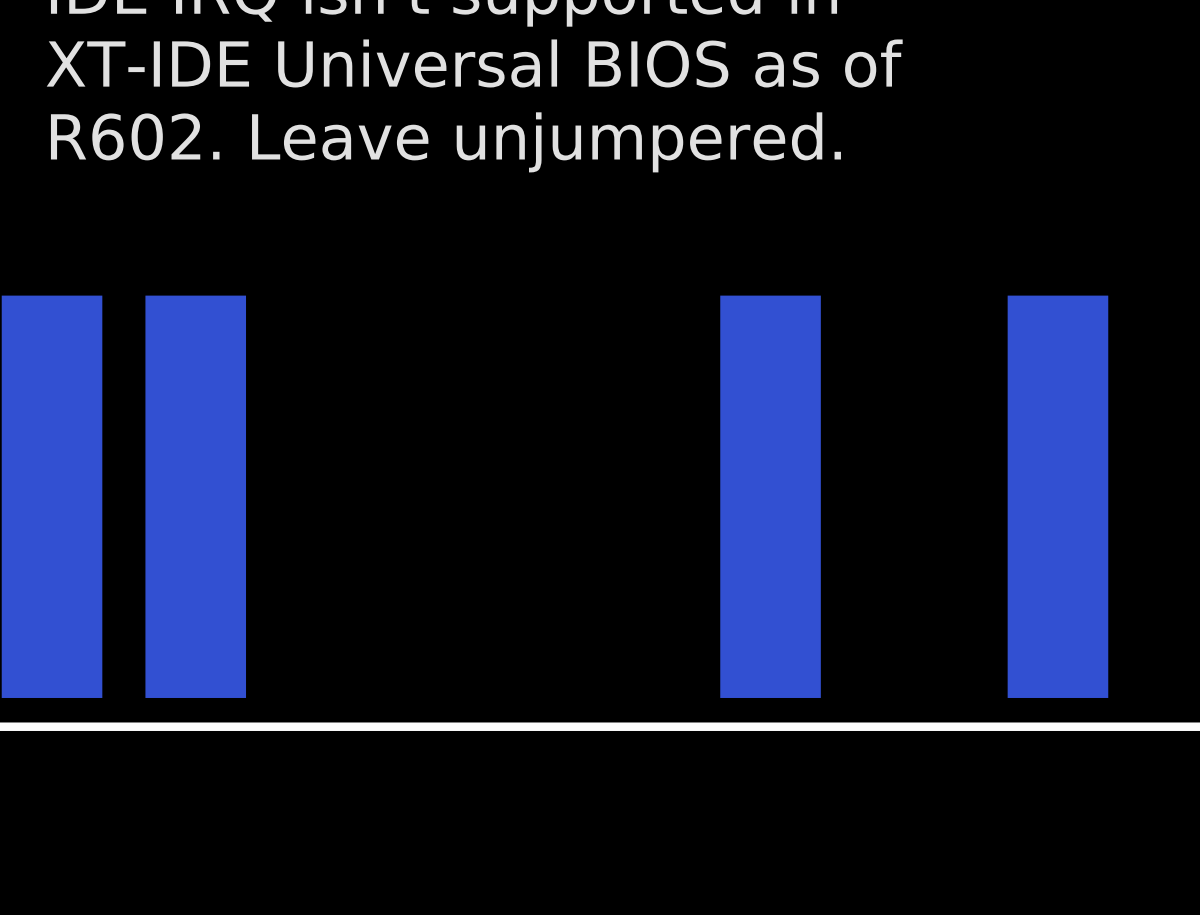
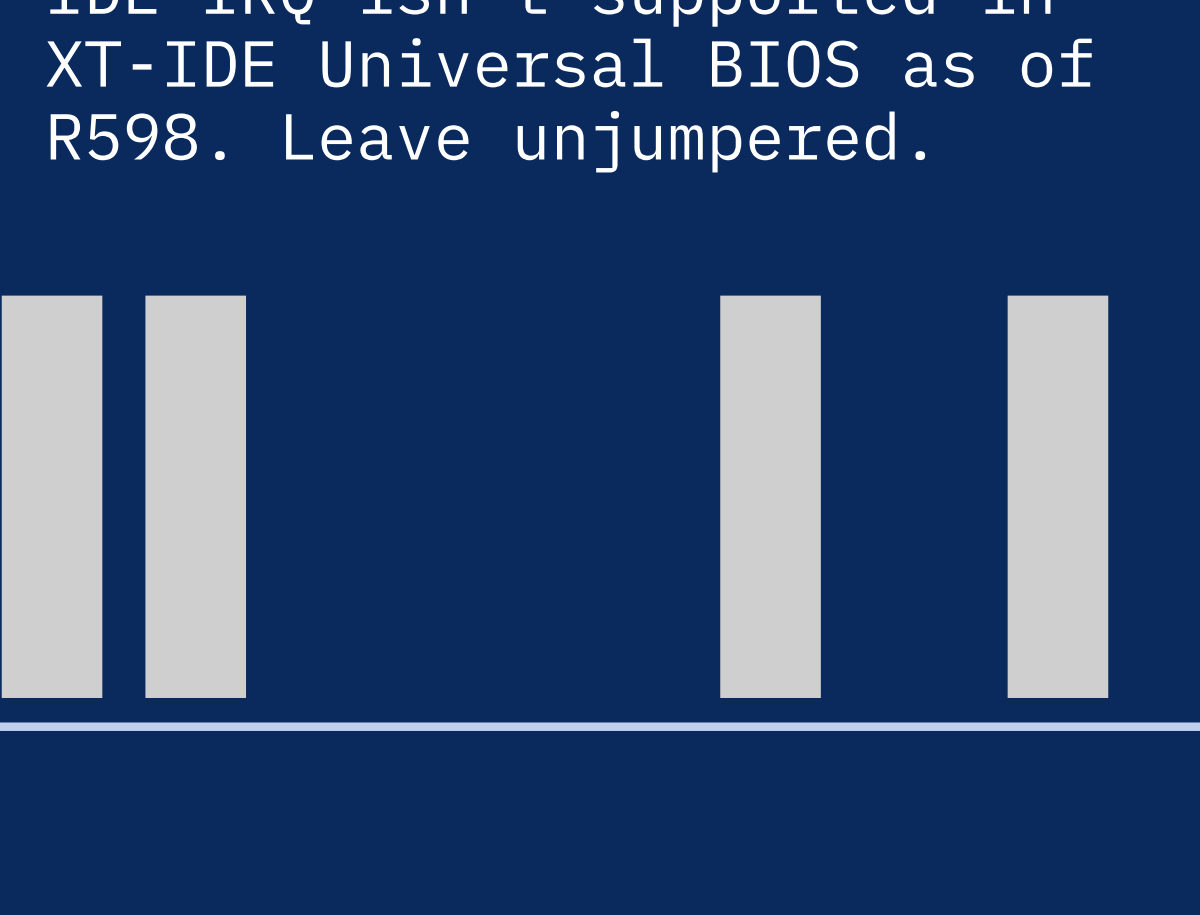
text: R602. Leave unjumpered. (445, 142) -> R598. Leave unjumpered. (487, 141)

